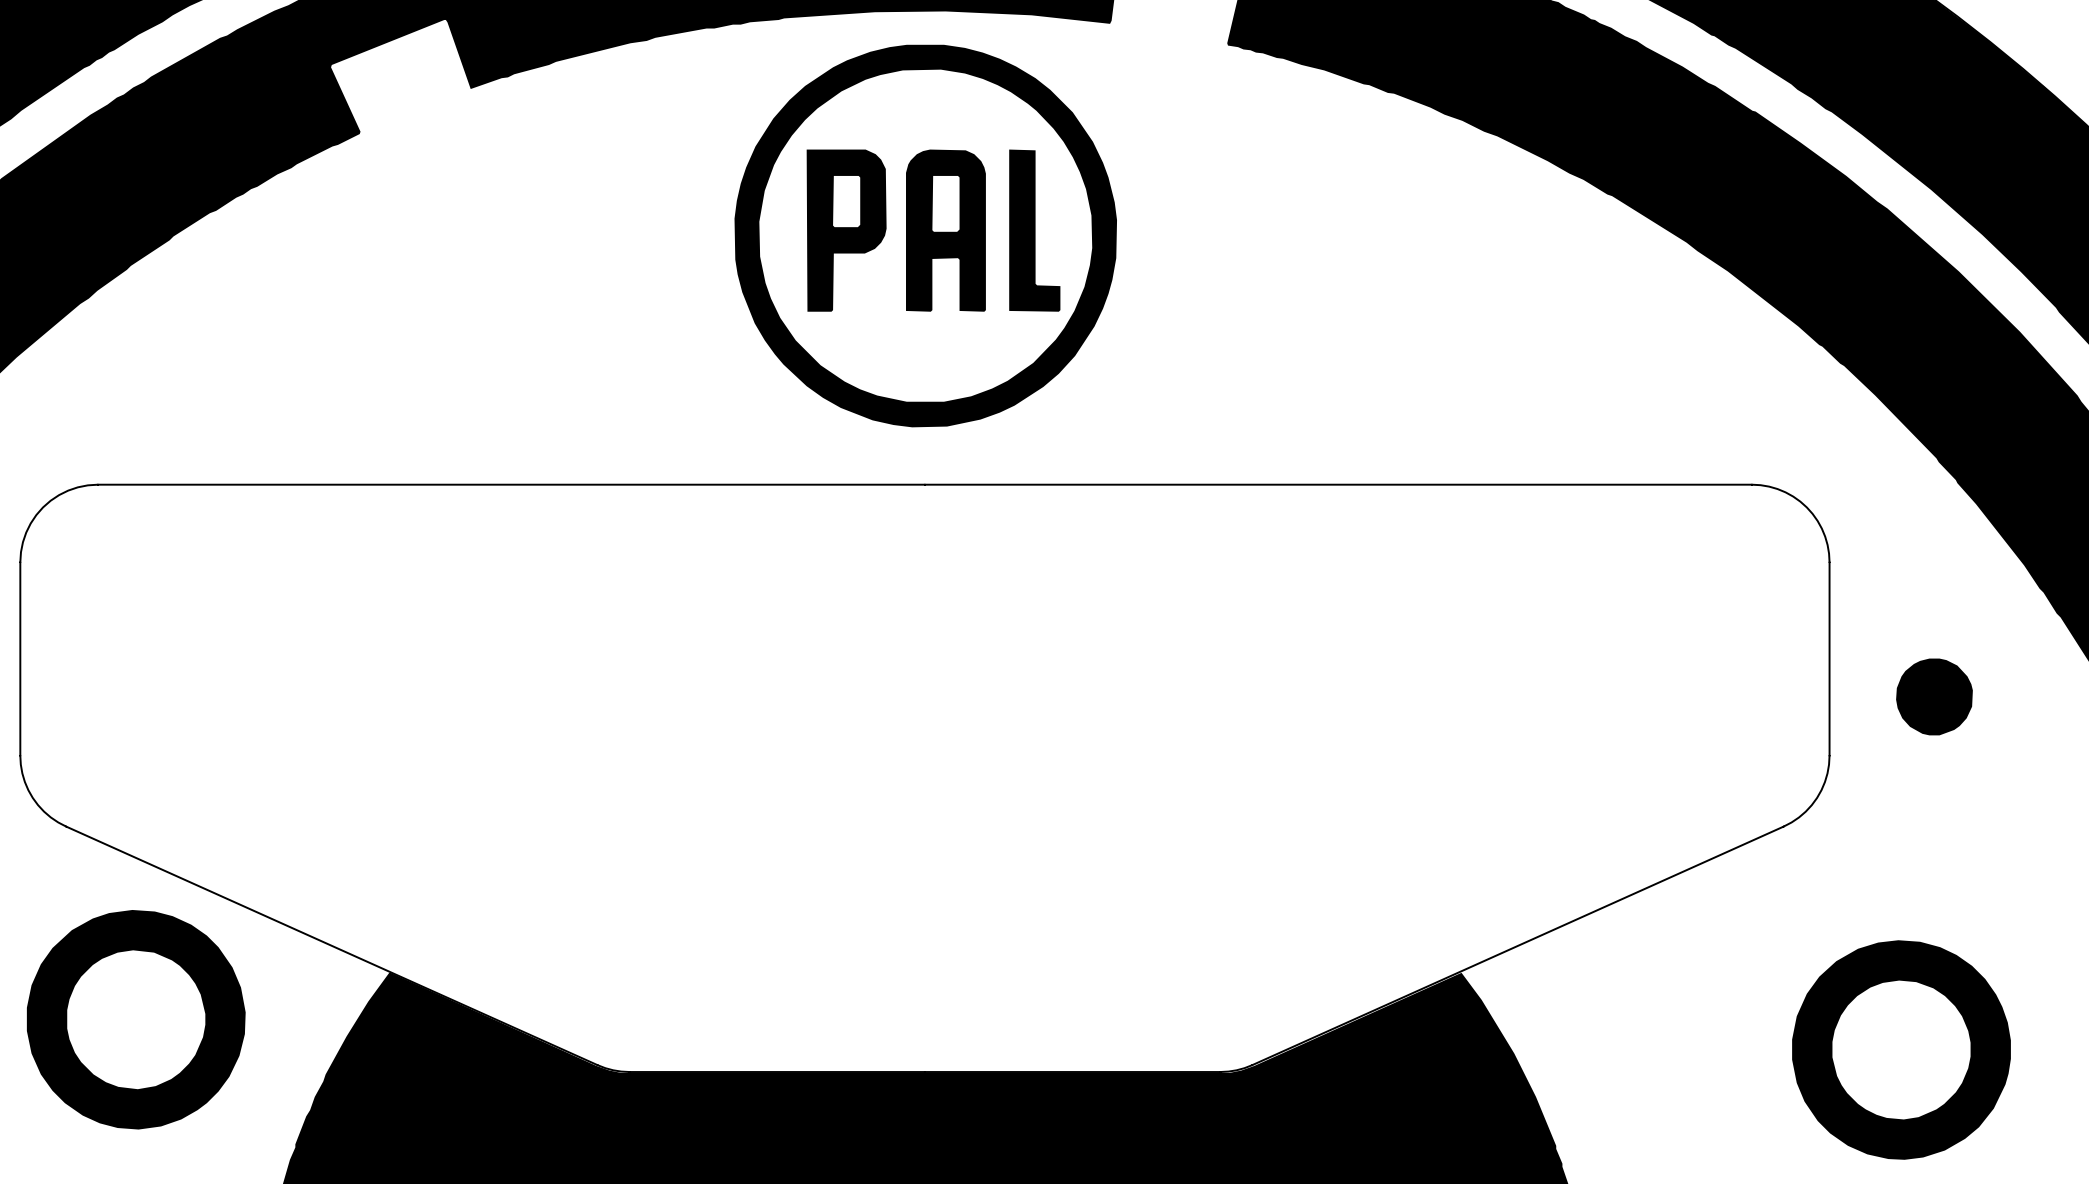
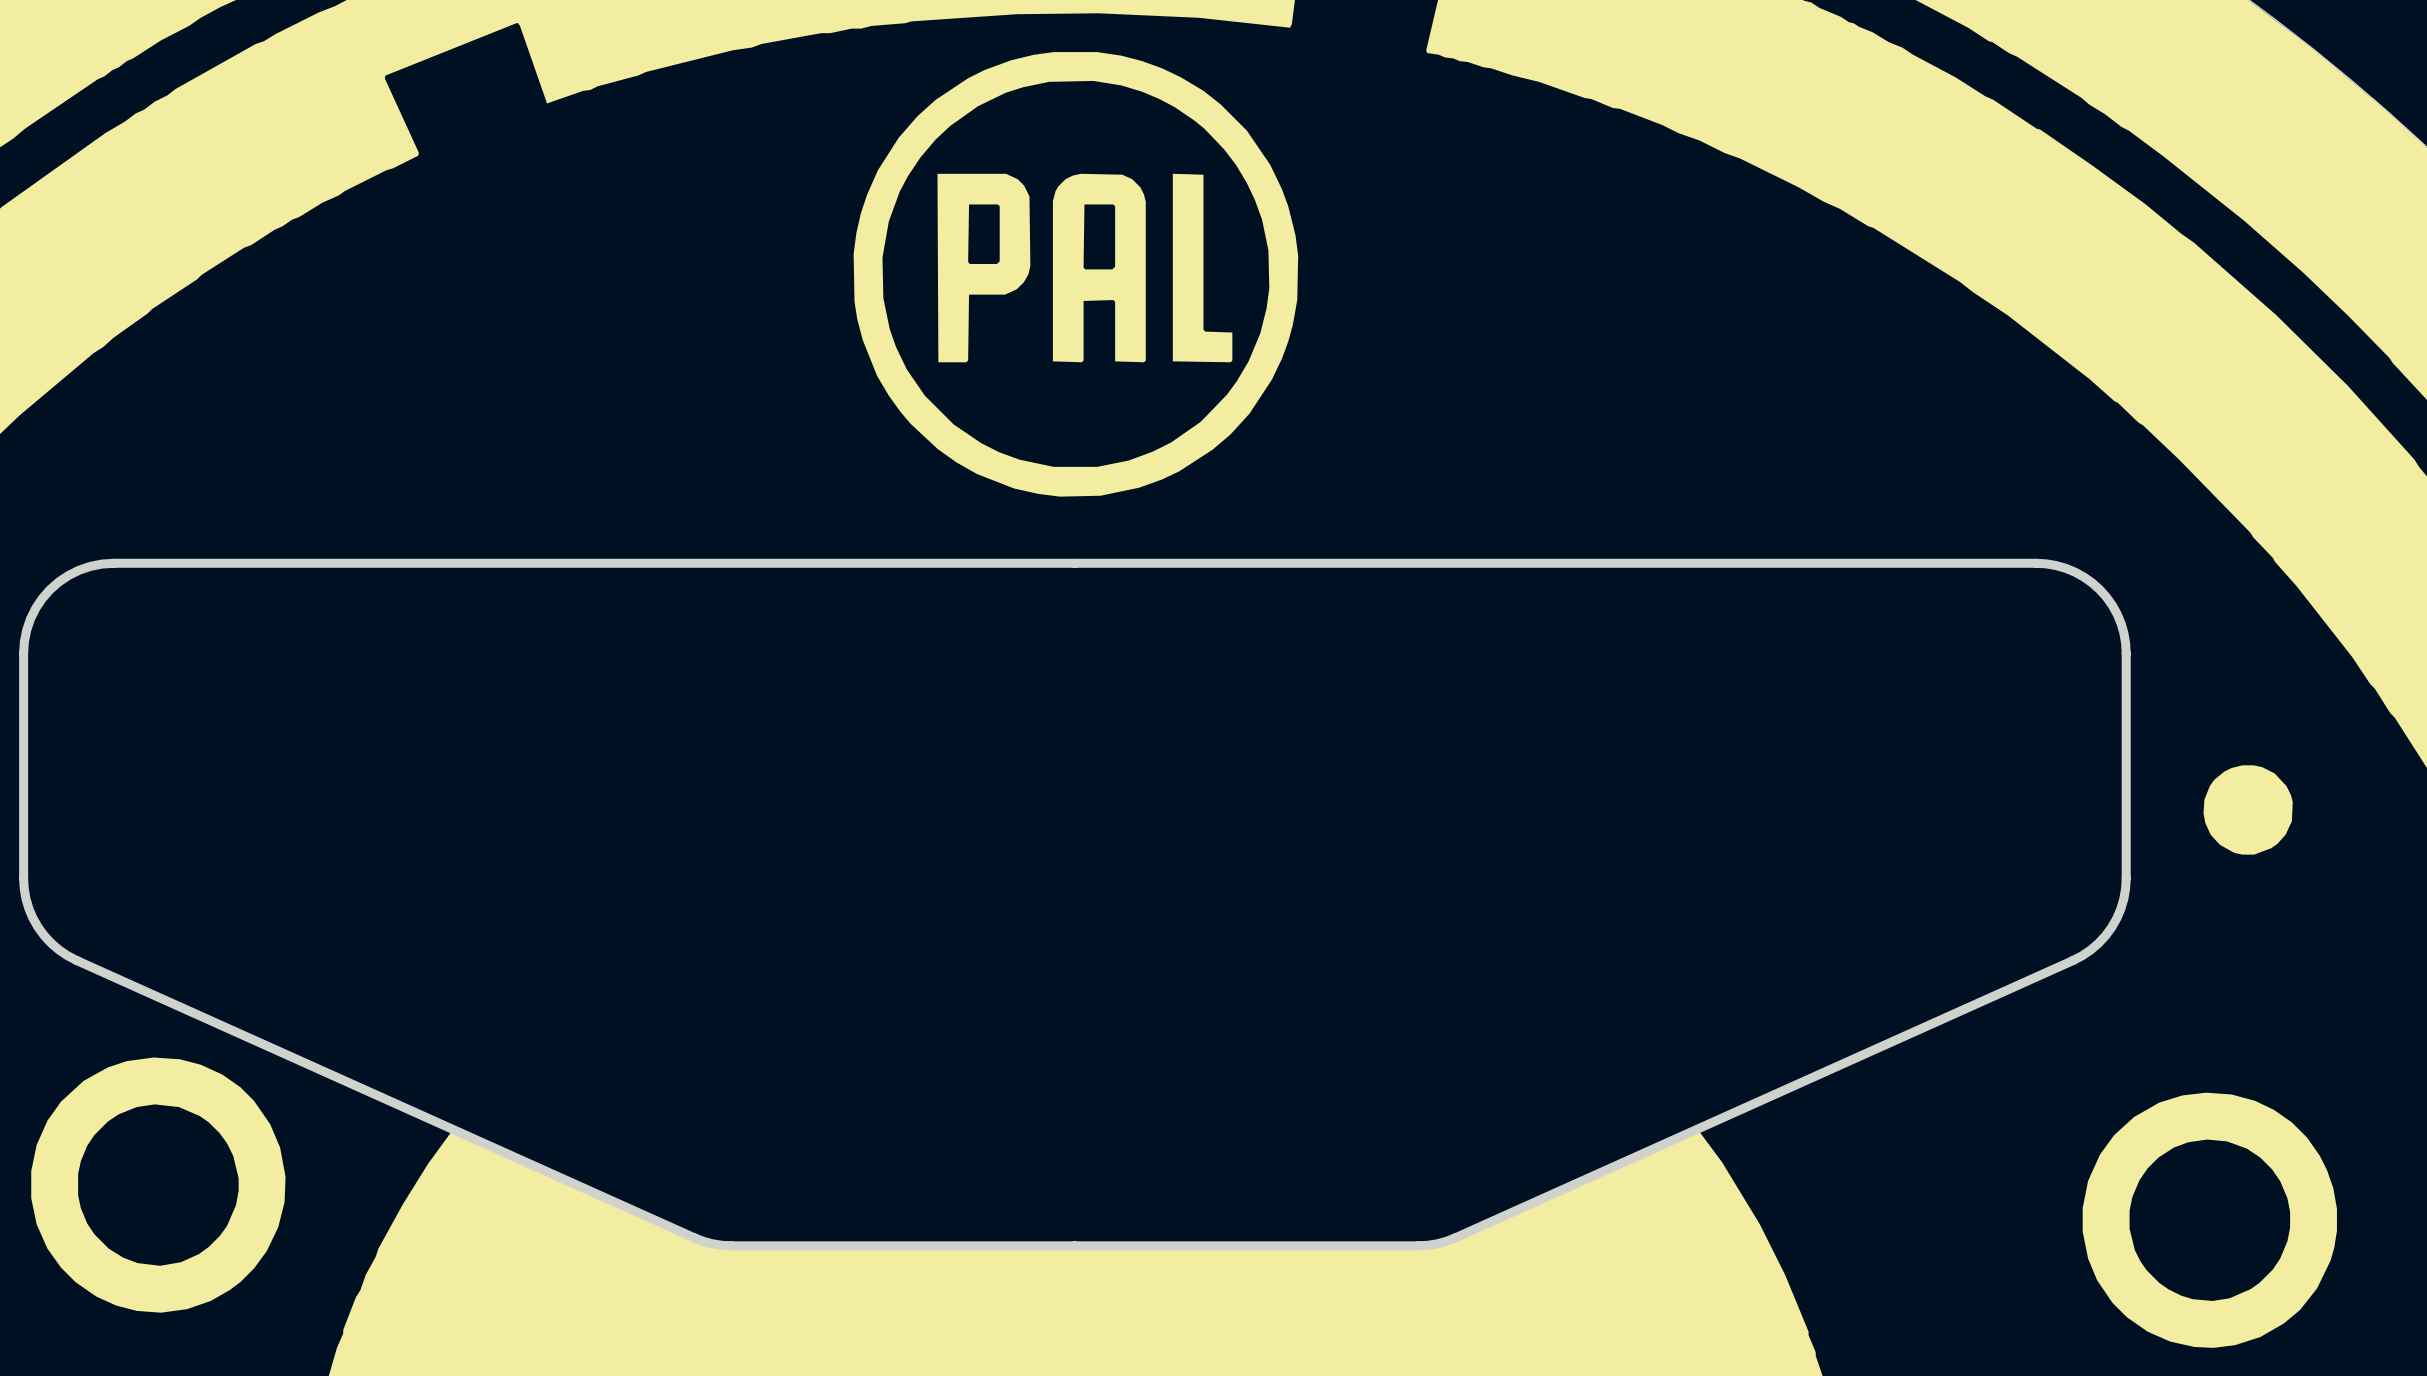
board edge width: thin (97, 484) (1760, 485) (1777, 489) (1800, 501) (1817, 521) (1827, 545) (1829, 562) (1829, 764) (1824, 781) (1817, 797) (1805, 811) (1783, 826) (1252, 1065) (1236, 1070) (1220, 1072) (629, 1072) (613, 1070) (597, 1065) (66, 826) (50, 817) (38, 805) (28, 790) (20, 764) (20, 552) (30, 523) (50, 500) (77, 487) (97, 484) -> thick (113, 563) (2046, 563) (2065, 568) (2092, 582) (2112, 605) (2123, 633) (2126, 653) (2125, 888) (2120, 908) (2111, 927) (2098, 943) (2072, 960) (1455, 1237) (1437, 1243) (1418, 1245) (731, 1245) (712, 1243) (694, 1237) (76, 960) (59, 950) (44, 935) (32, 918) (24, 888) (24, 641) (30, 618) (35, 608) (50, 589) (58, 581) (68, 575) (90, 566) (113, 563)

